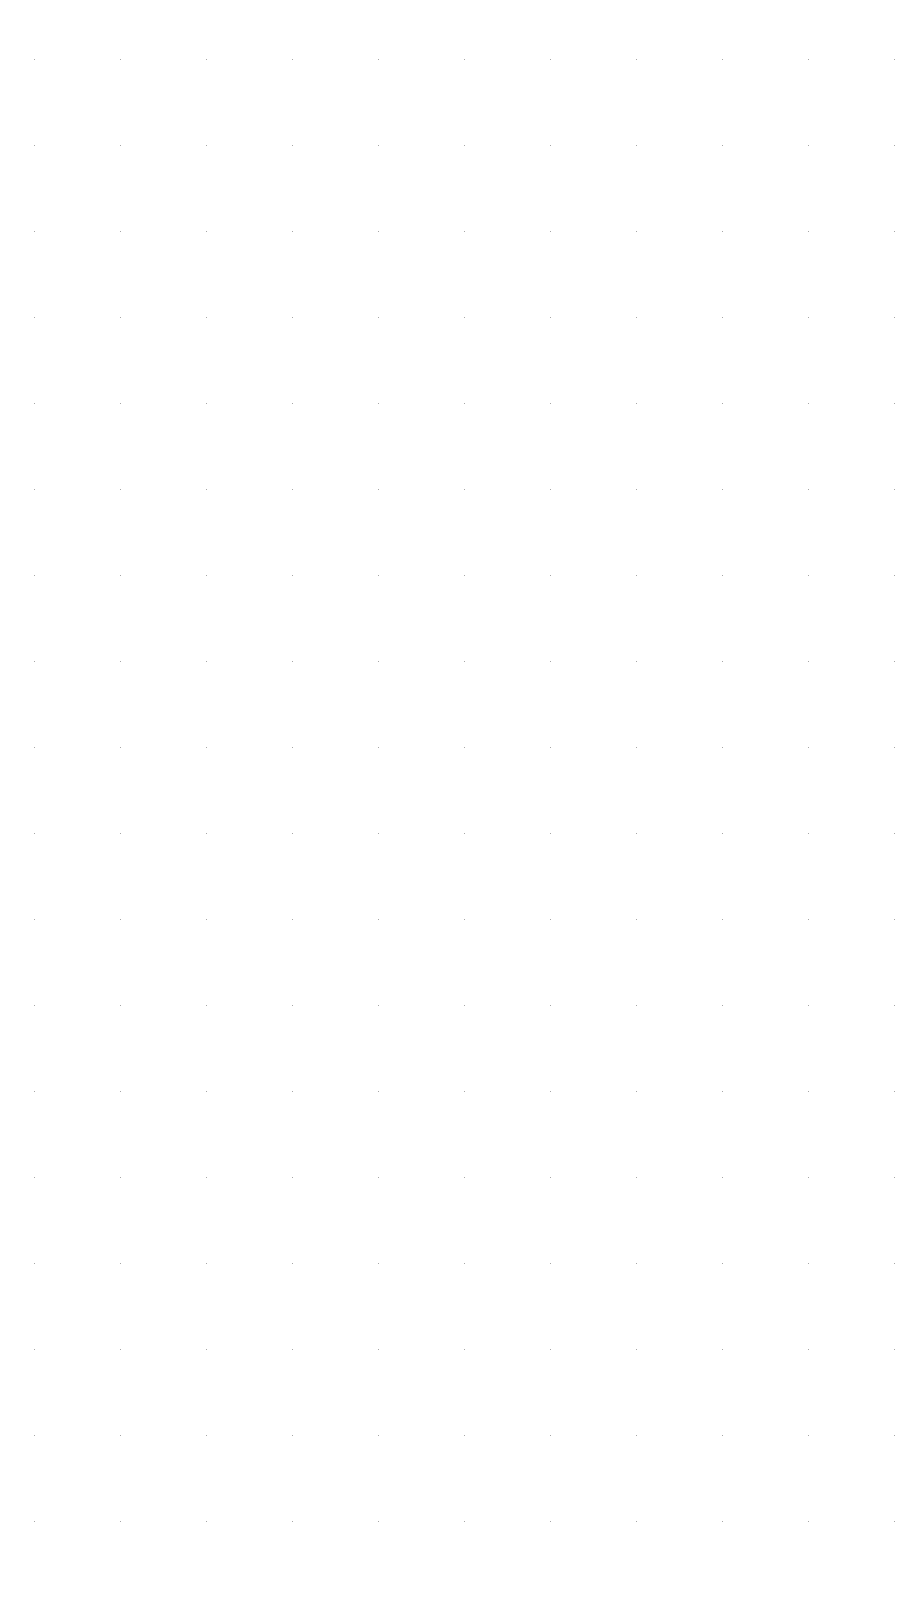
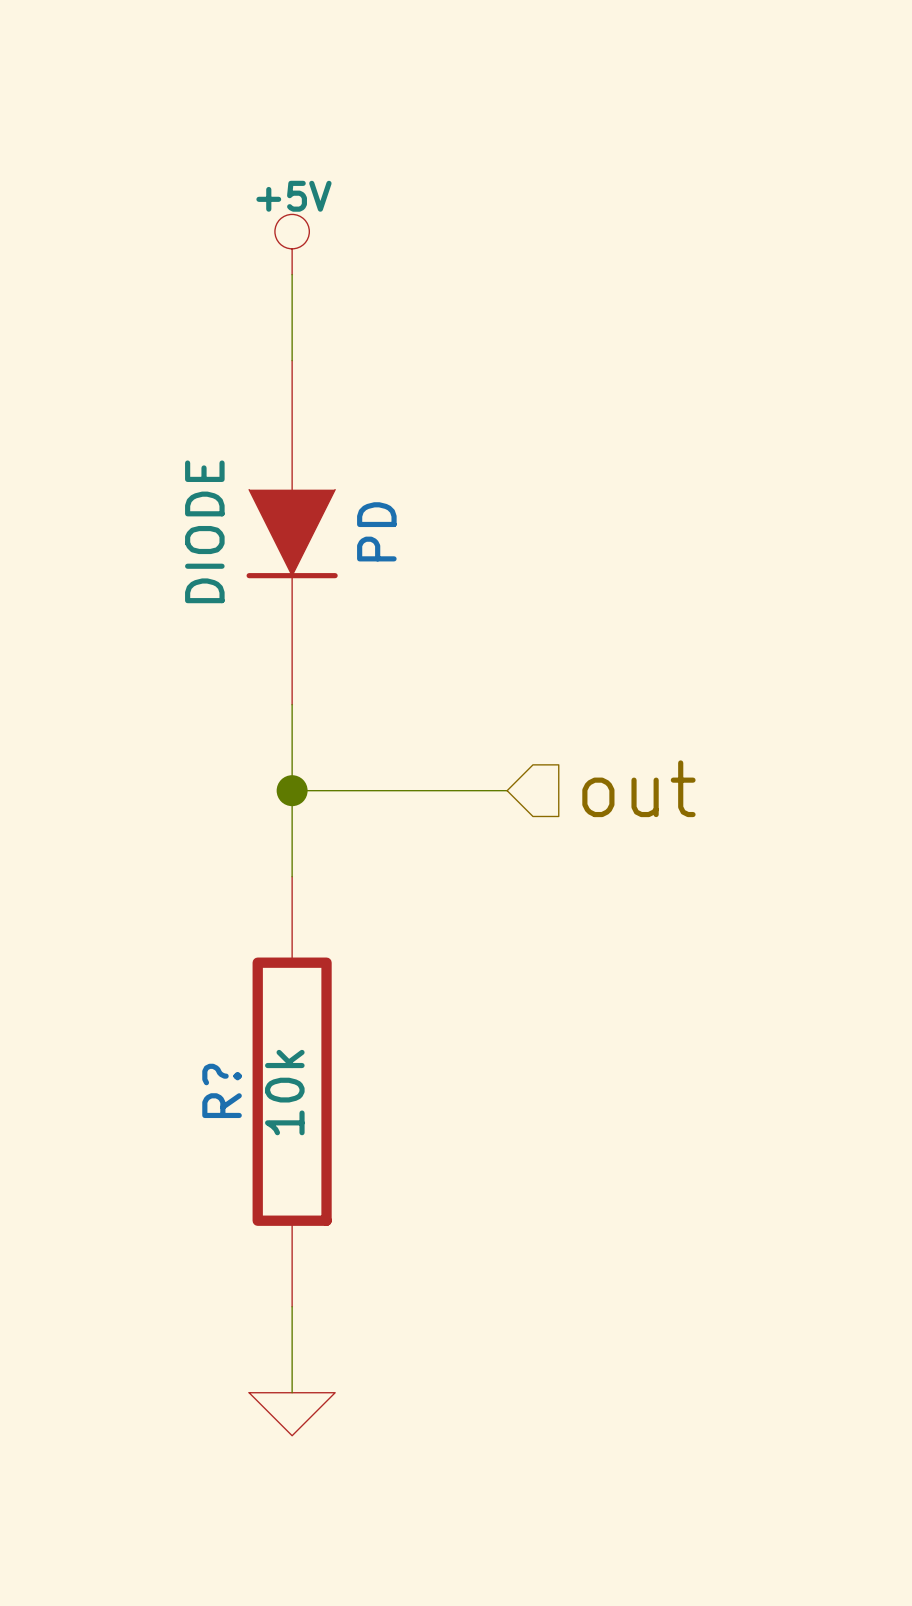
power symbol: none -> +5V (292, 244)
wire: none -> (292, 274) (292, 360)
PD: none -> DIODE (292, 532)
wire: none -> (292, 704) (292, 876)
hierarchical label: none -> out (638, 788)
wire: none -> (292, 790) (507, 790)
junction: none -> (292, 790)
R?: none -> 10k (292, 1091)
wire: none -> (292, 1306) (292, 1392)
power symbol: none -> (292, 1414)

